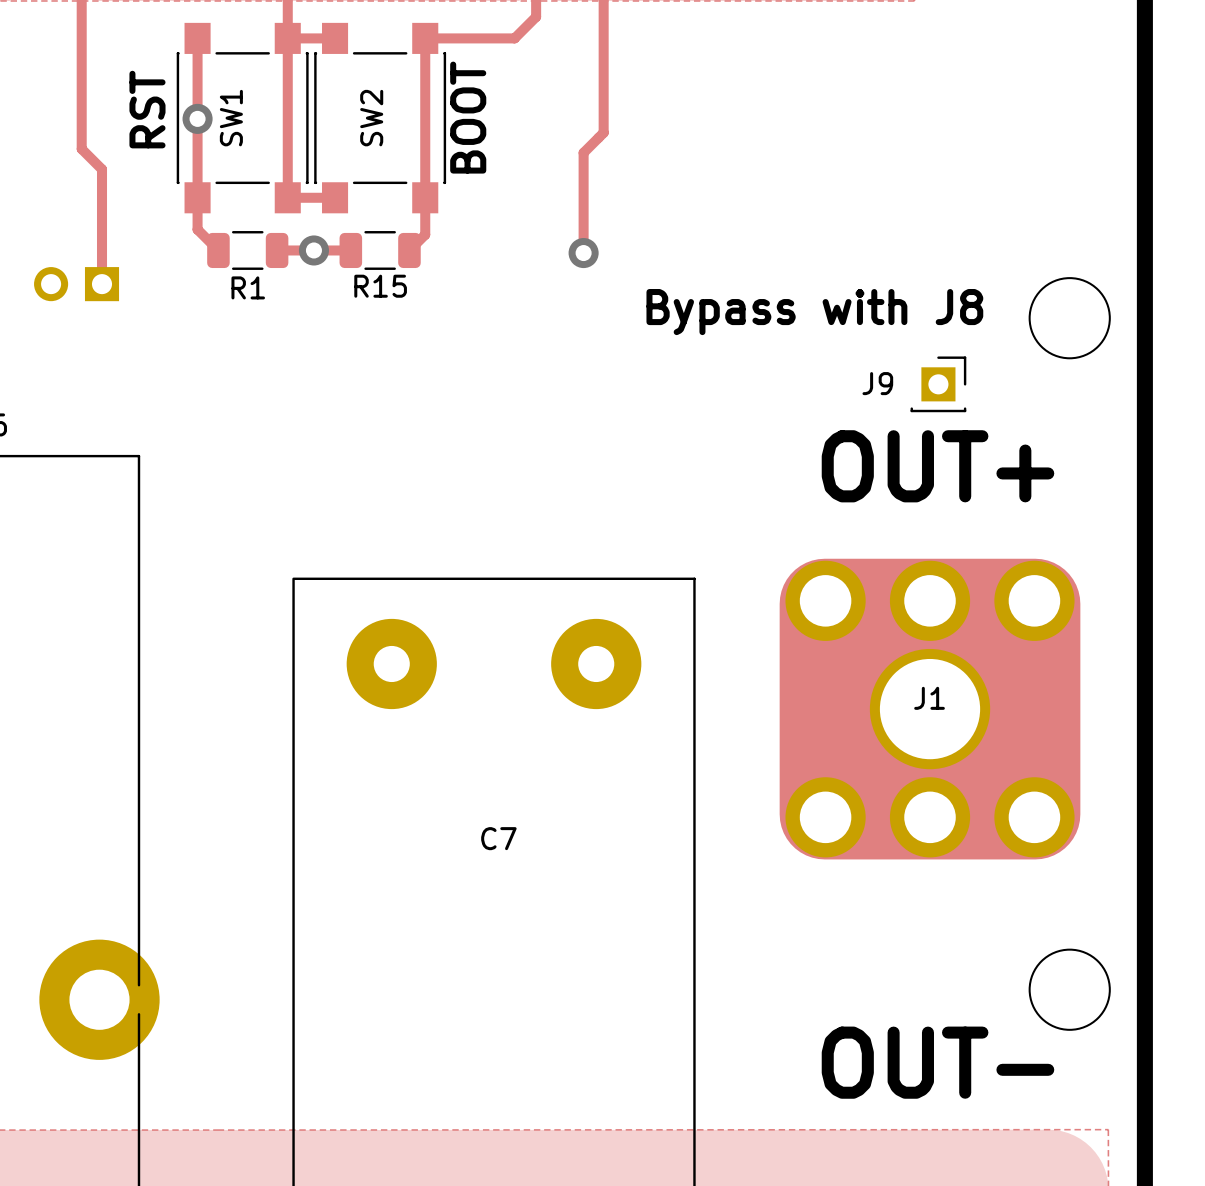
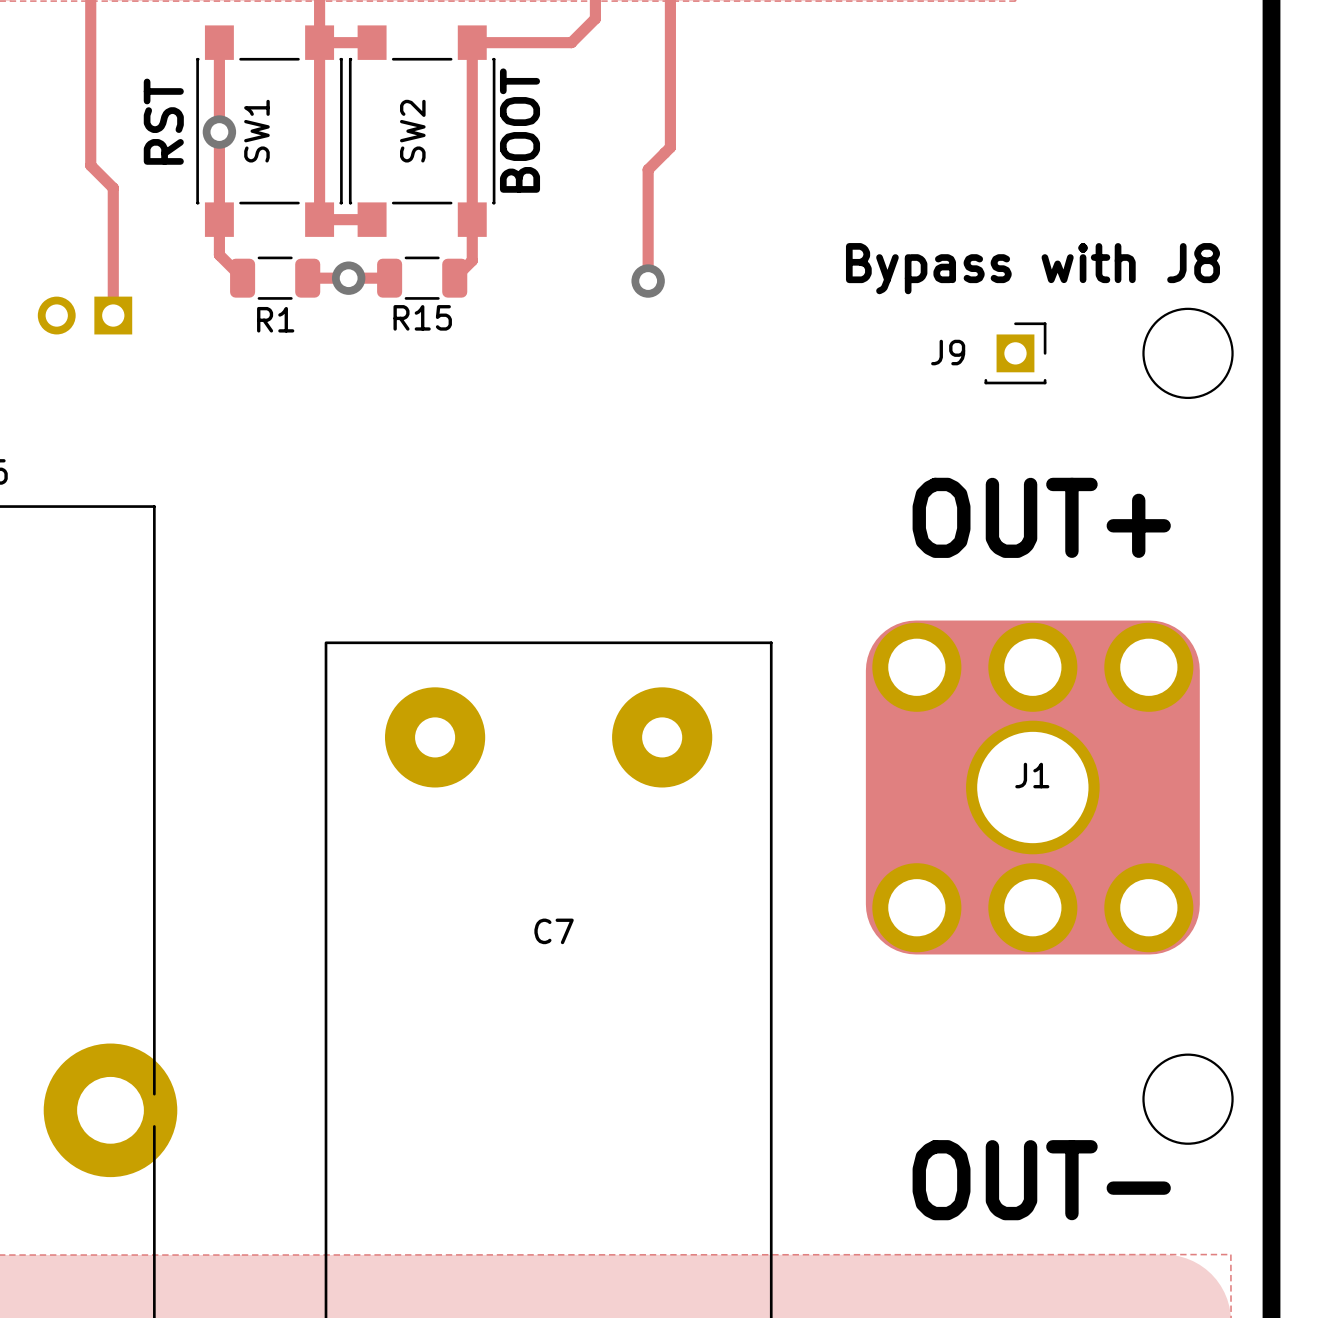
text position: Bypass with J8 (814, 312) -> Bypass with J8 (1032, 268)
J9 position: (938, 384) -> (1015, 353)

